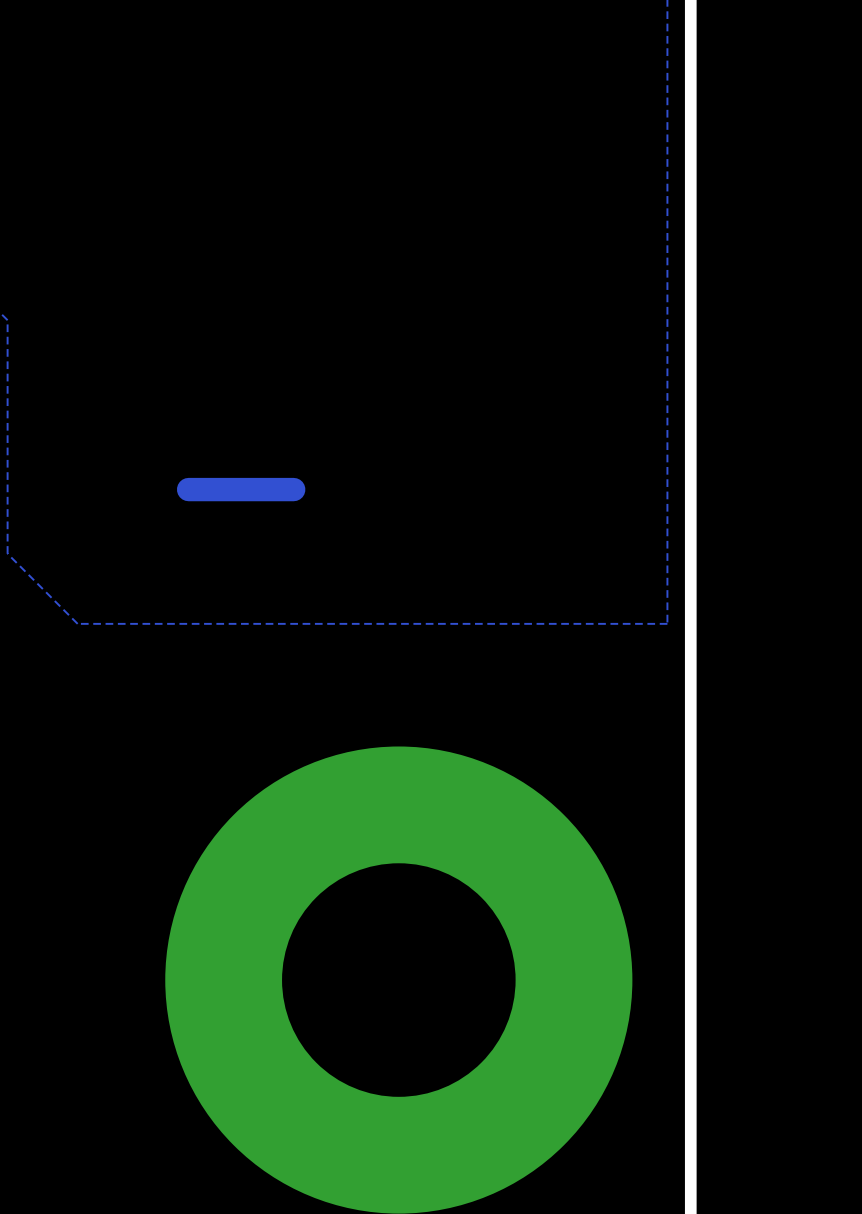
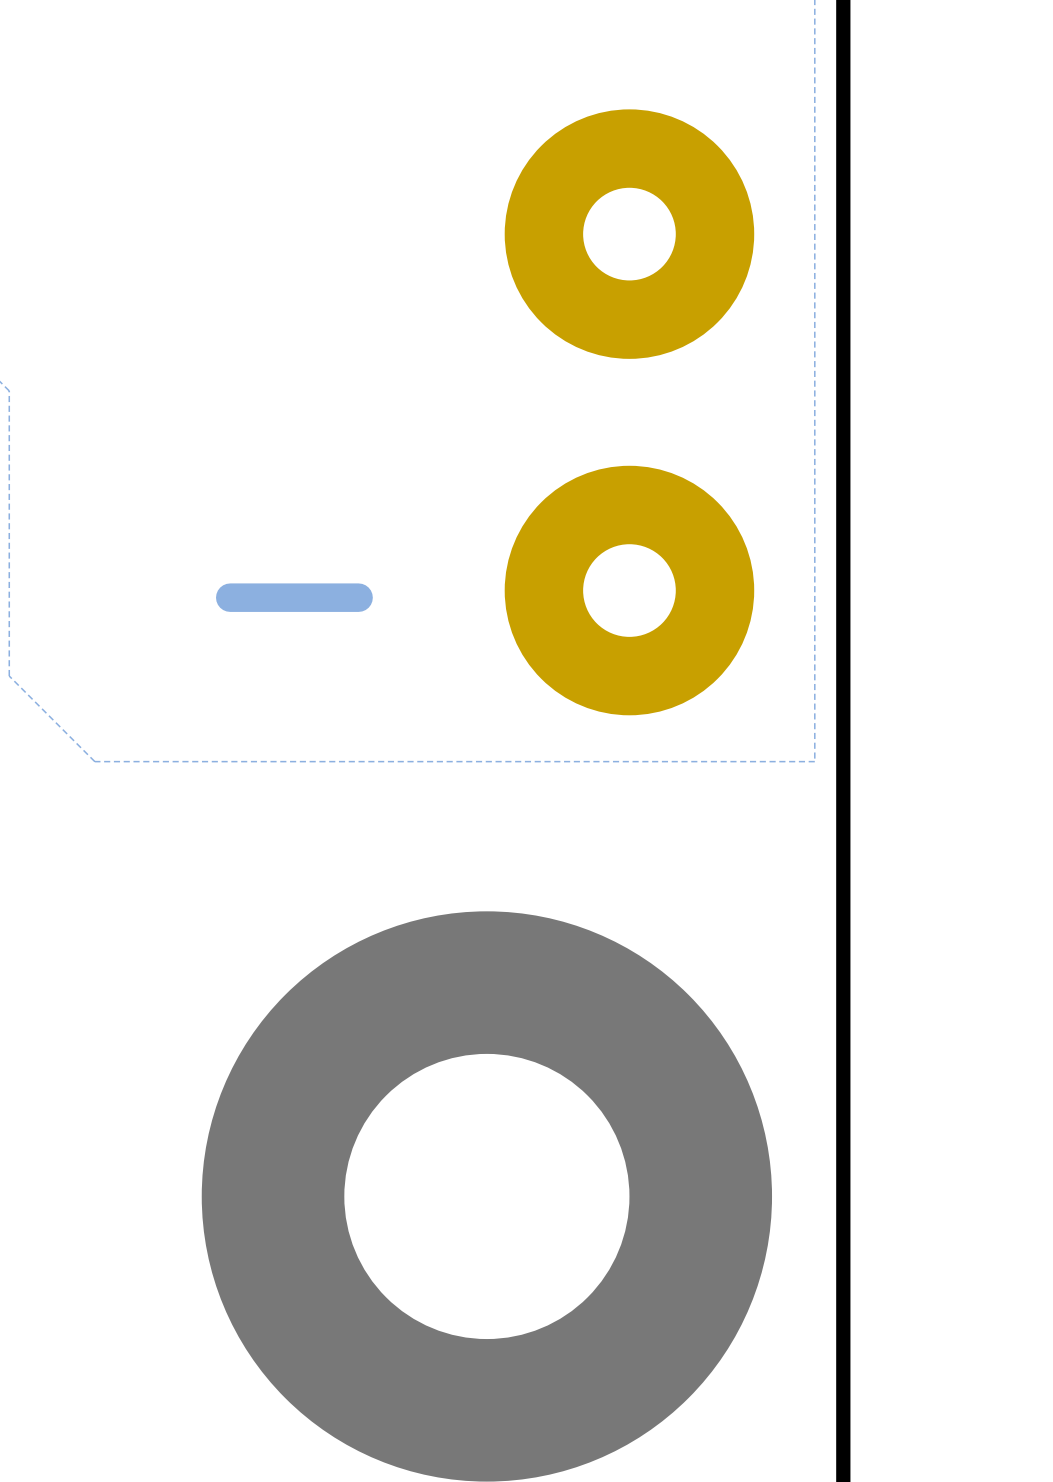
part: none -> (629, 412)

